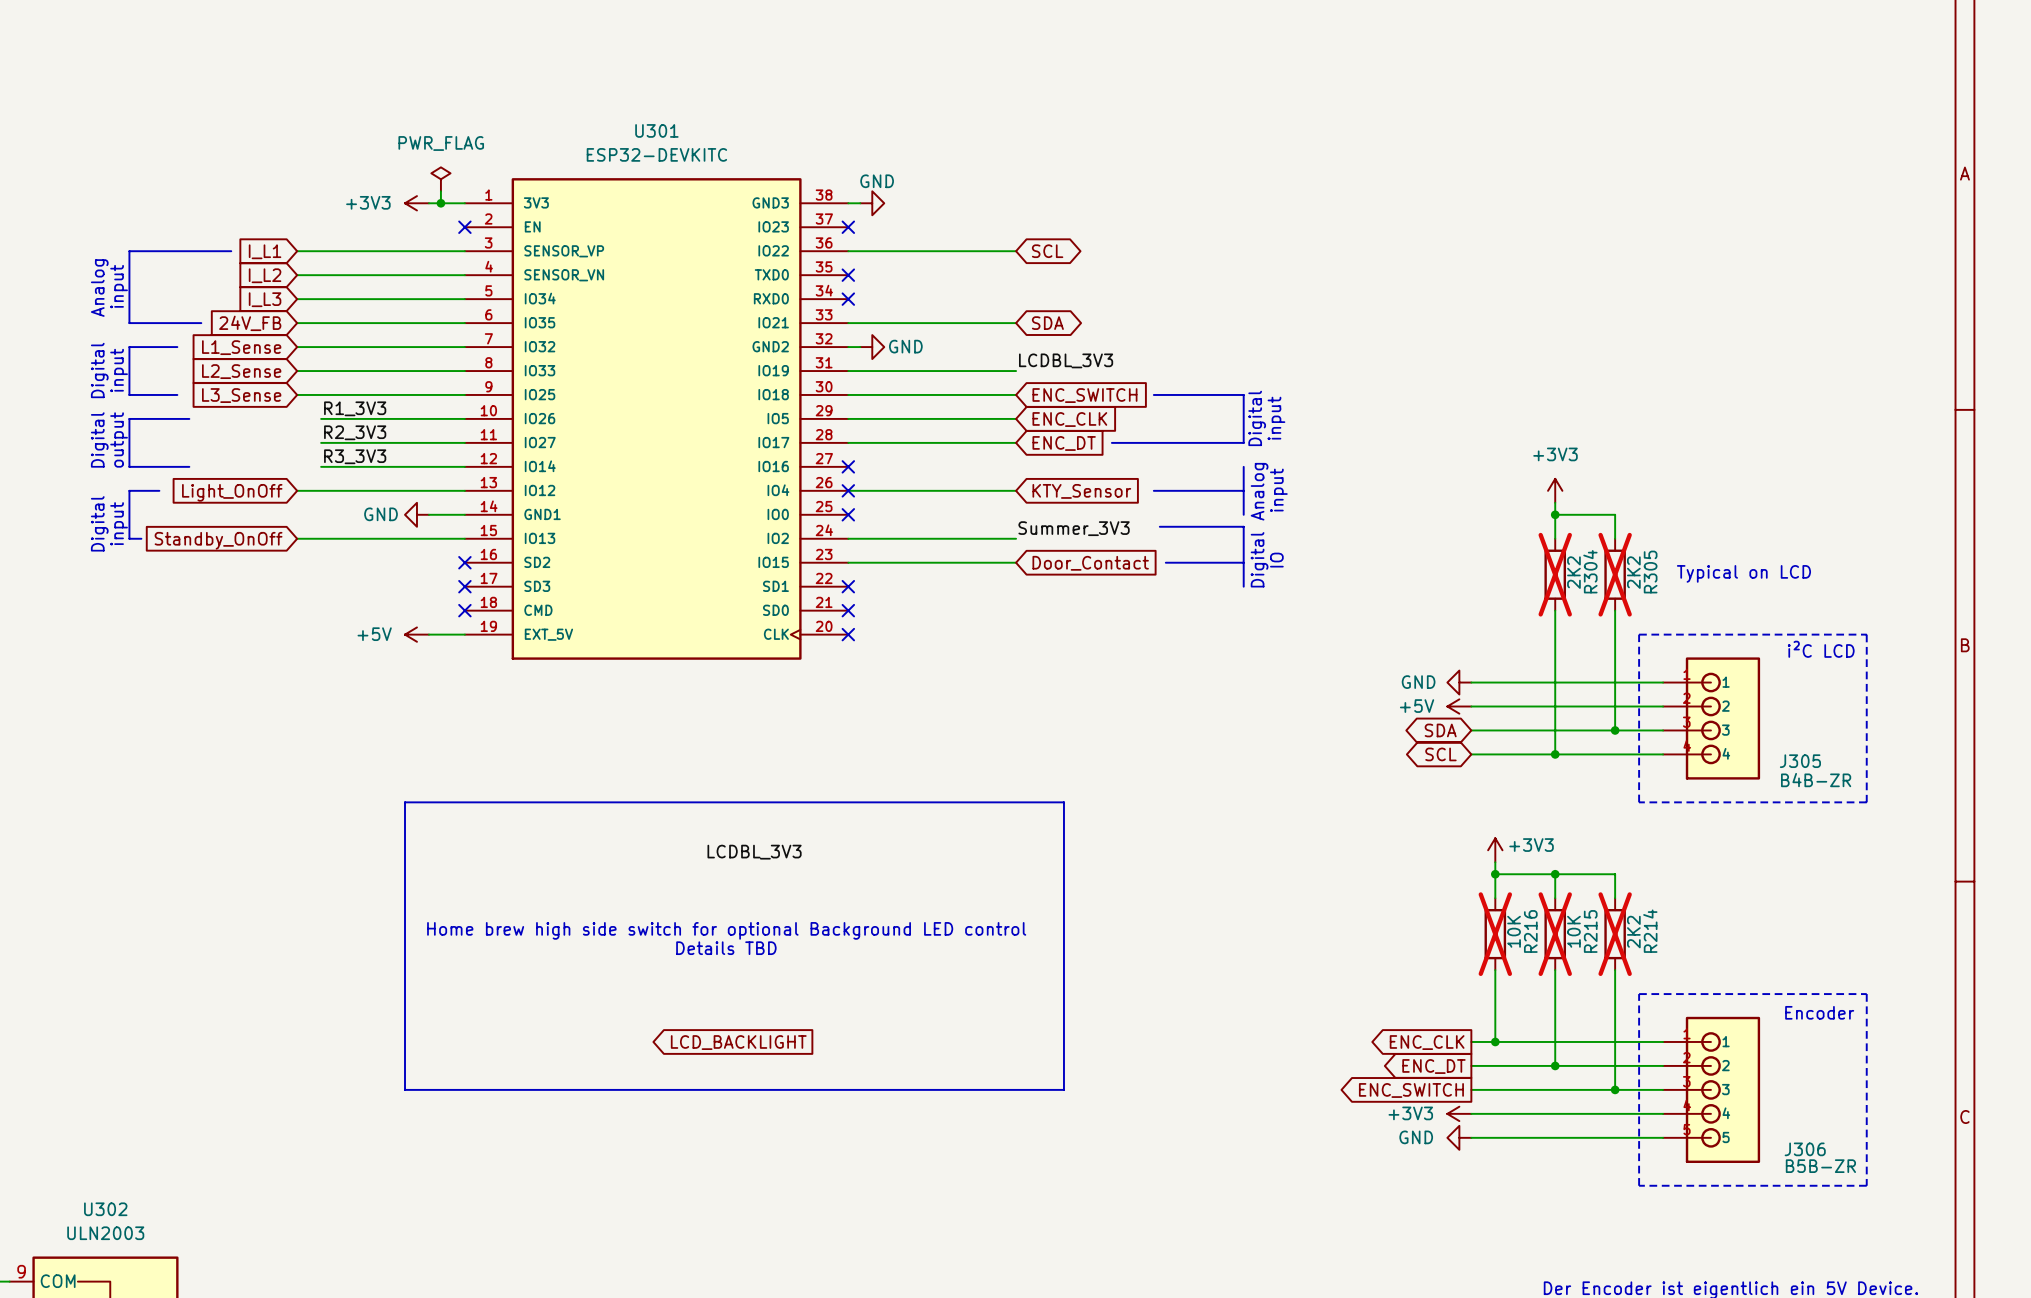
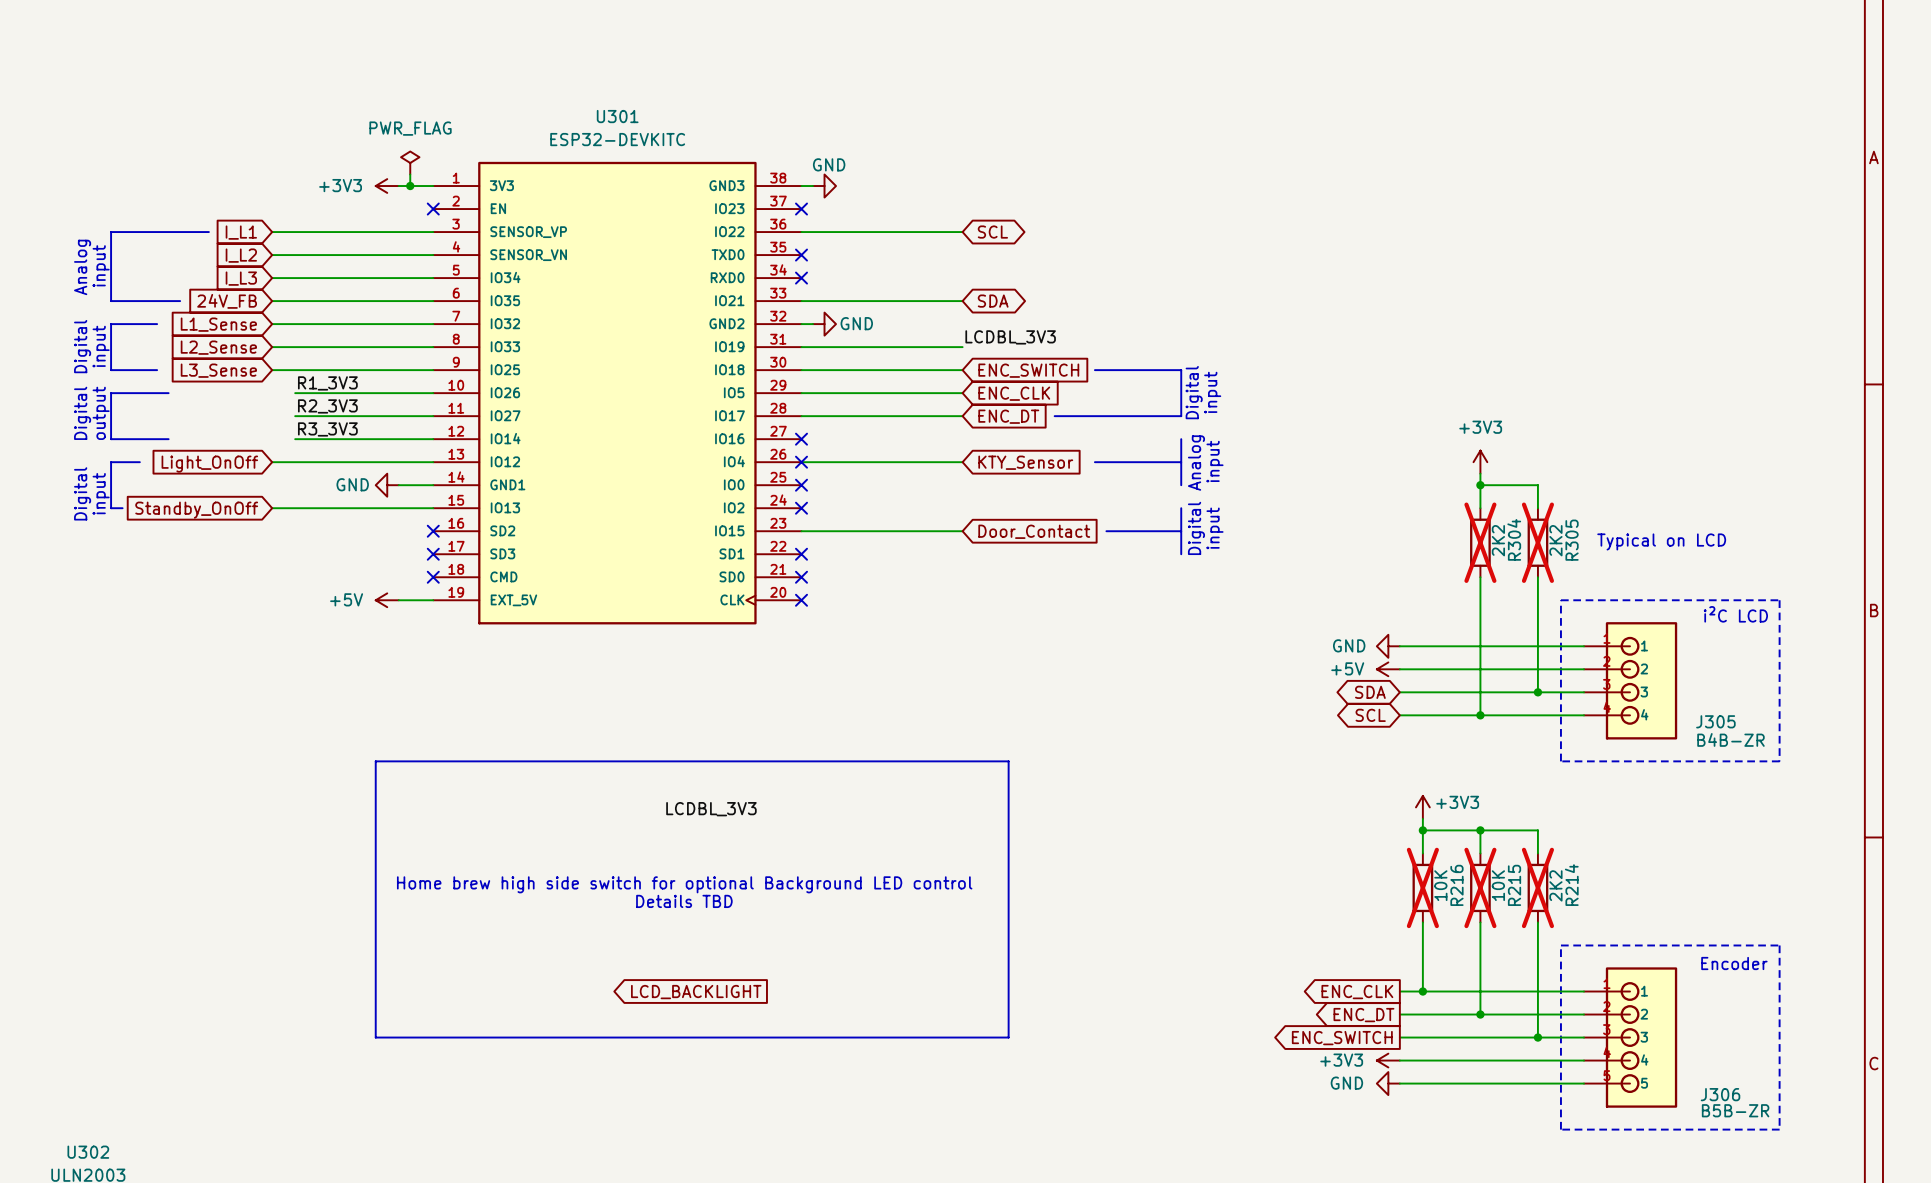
line: (1159, 526) (1243, 526) (1243, 538) -> none
label: Summer_3V3 (1074, 528) -> none
wire: (848, 538) (1016, 538) -> none
no-connect mark: none -> (801, 508)
text: IO (1276, 560) -> input (1215, 528)

